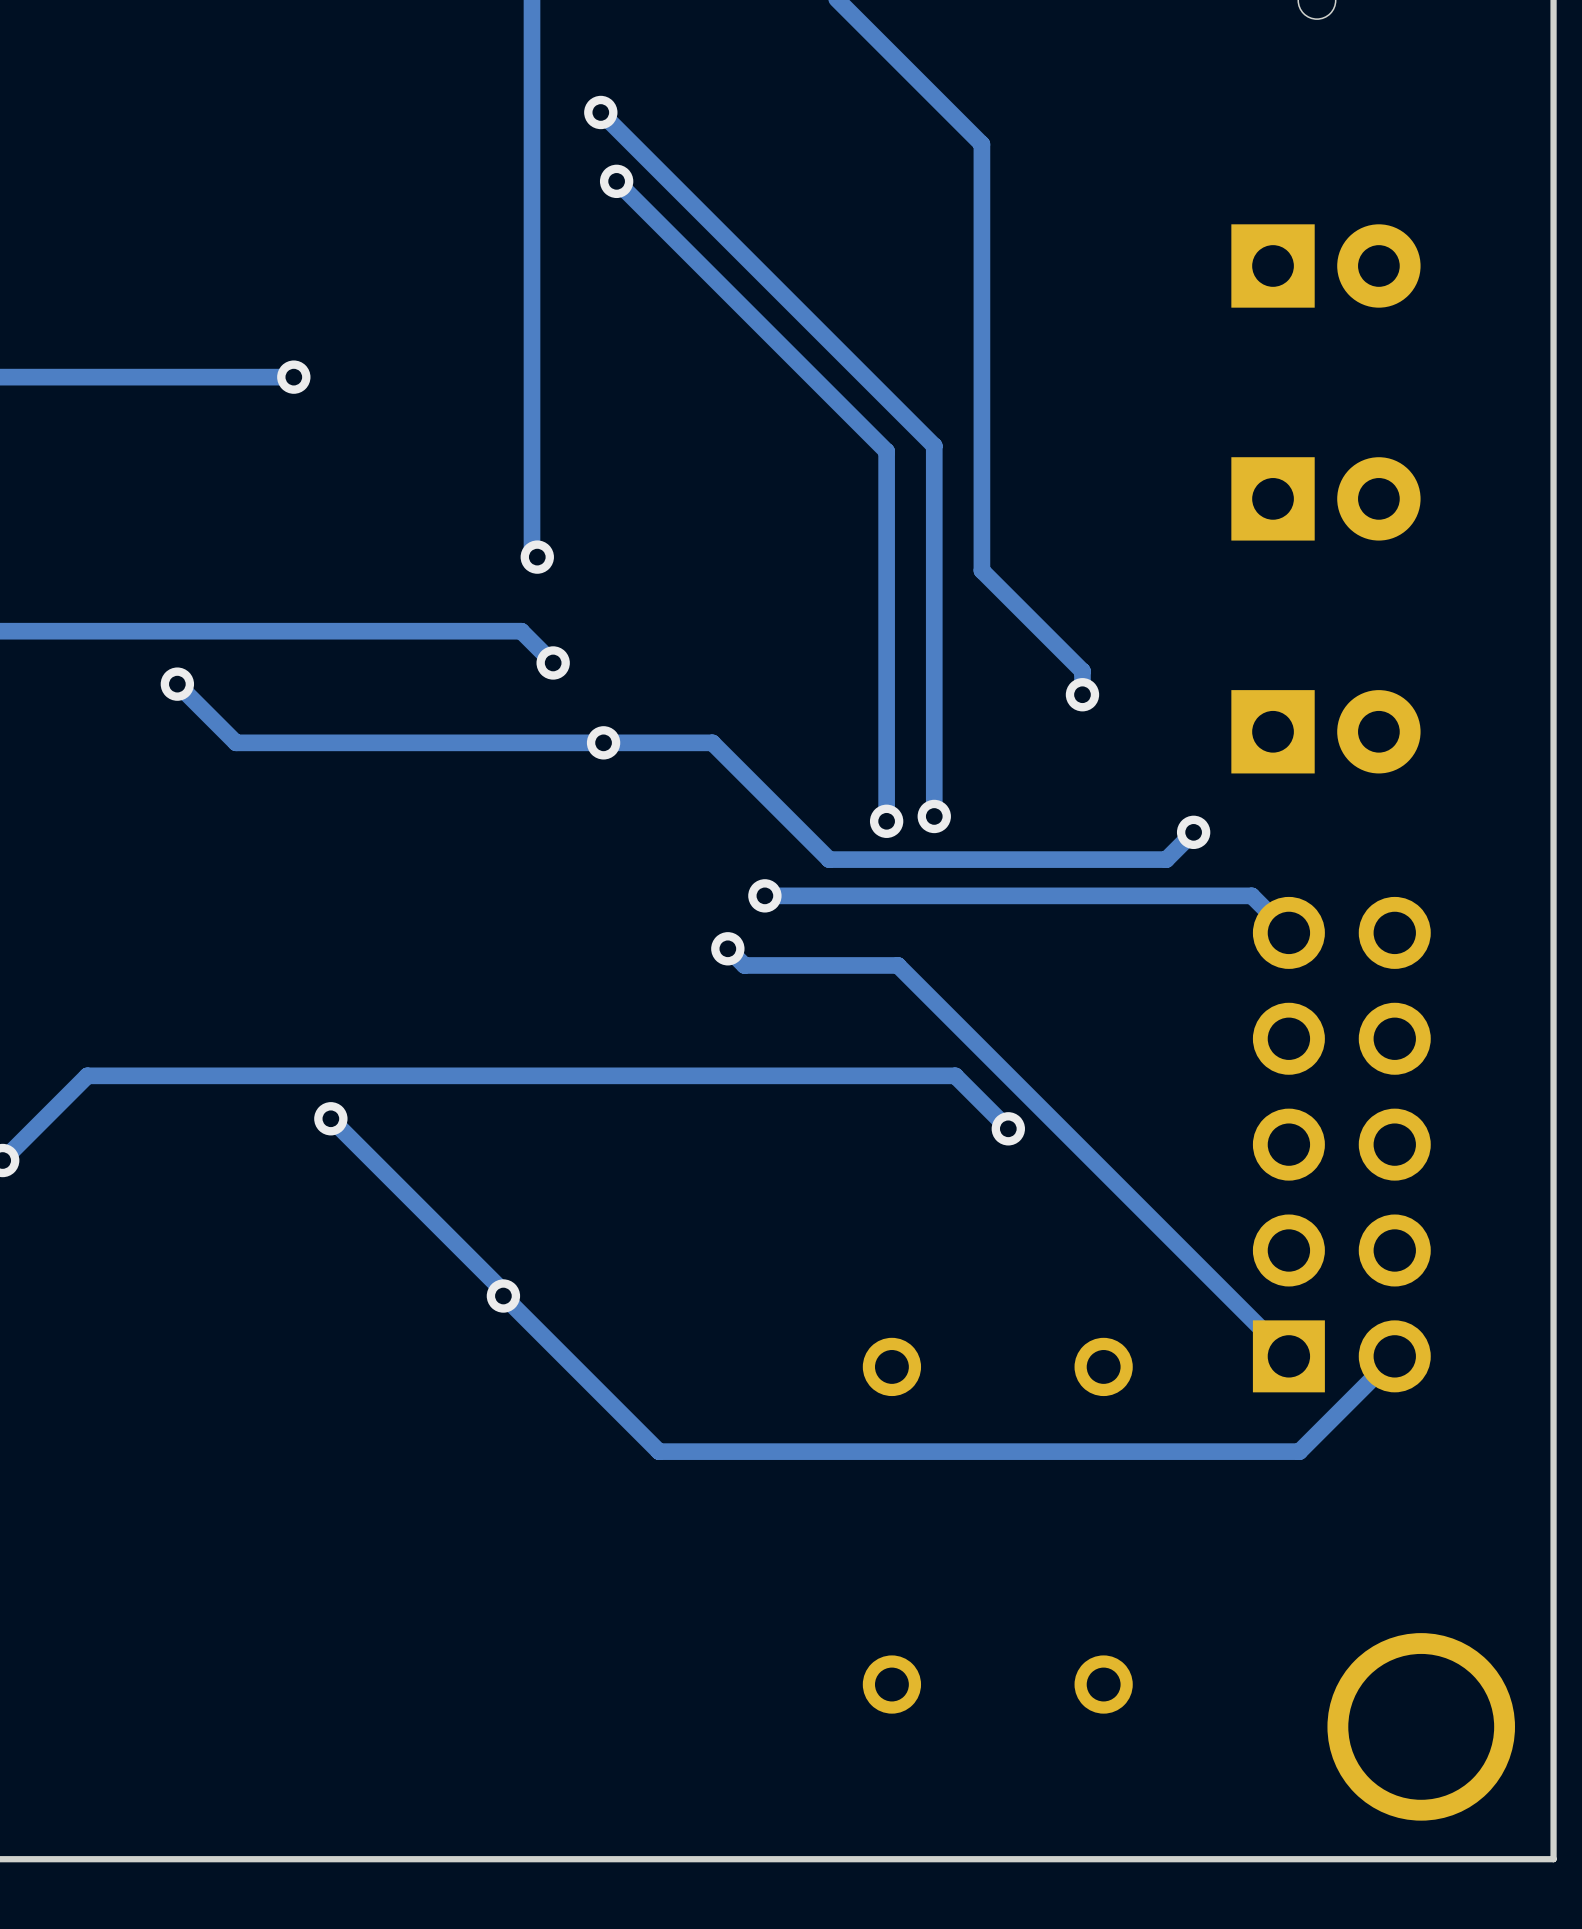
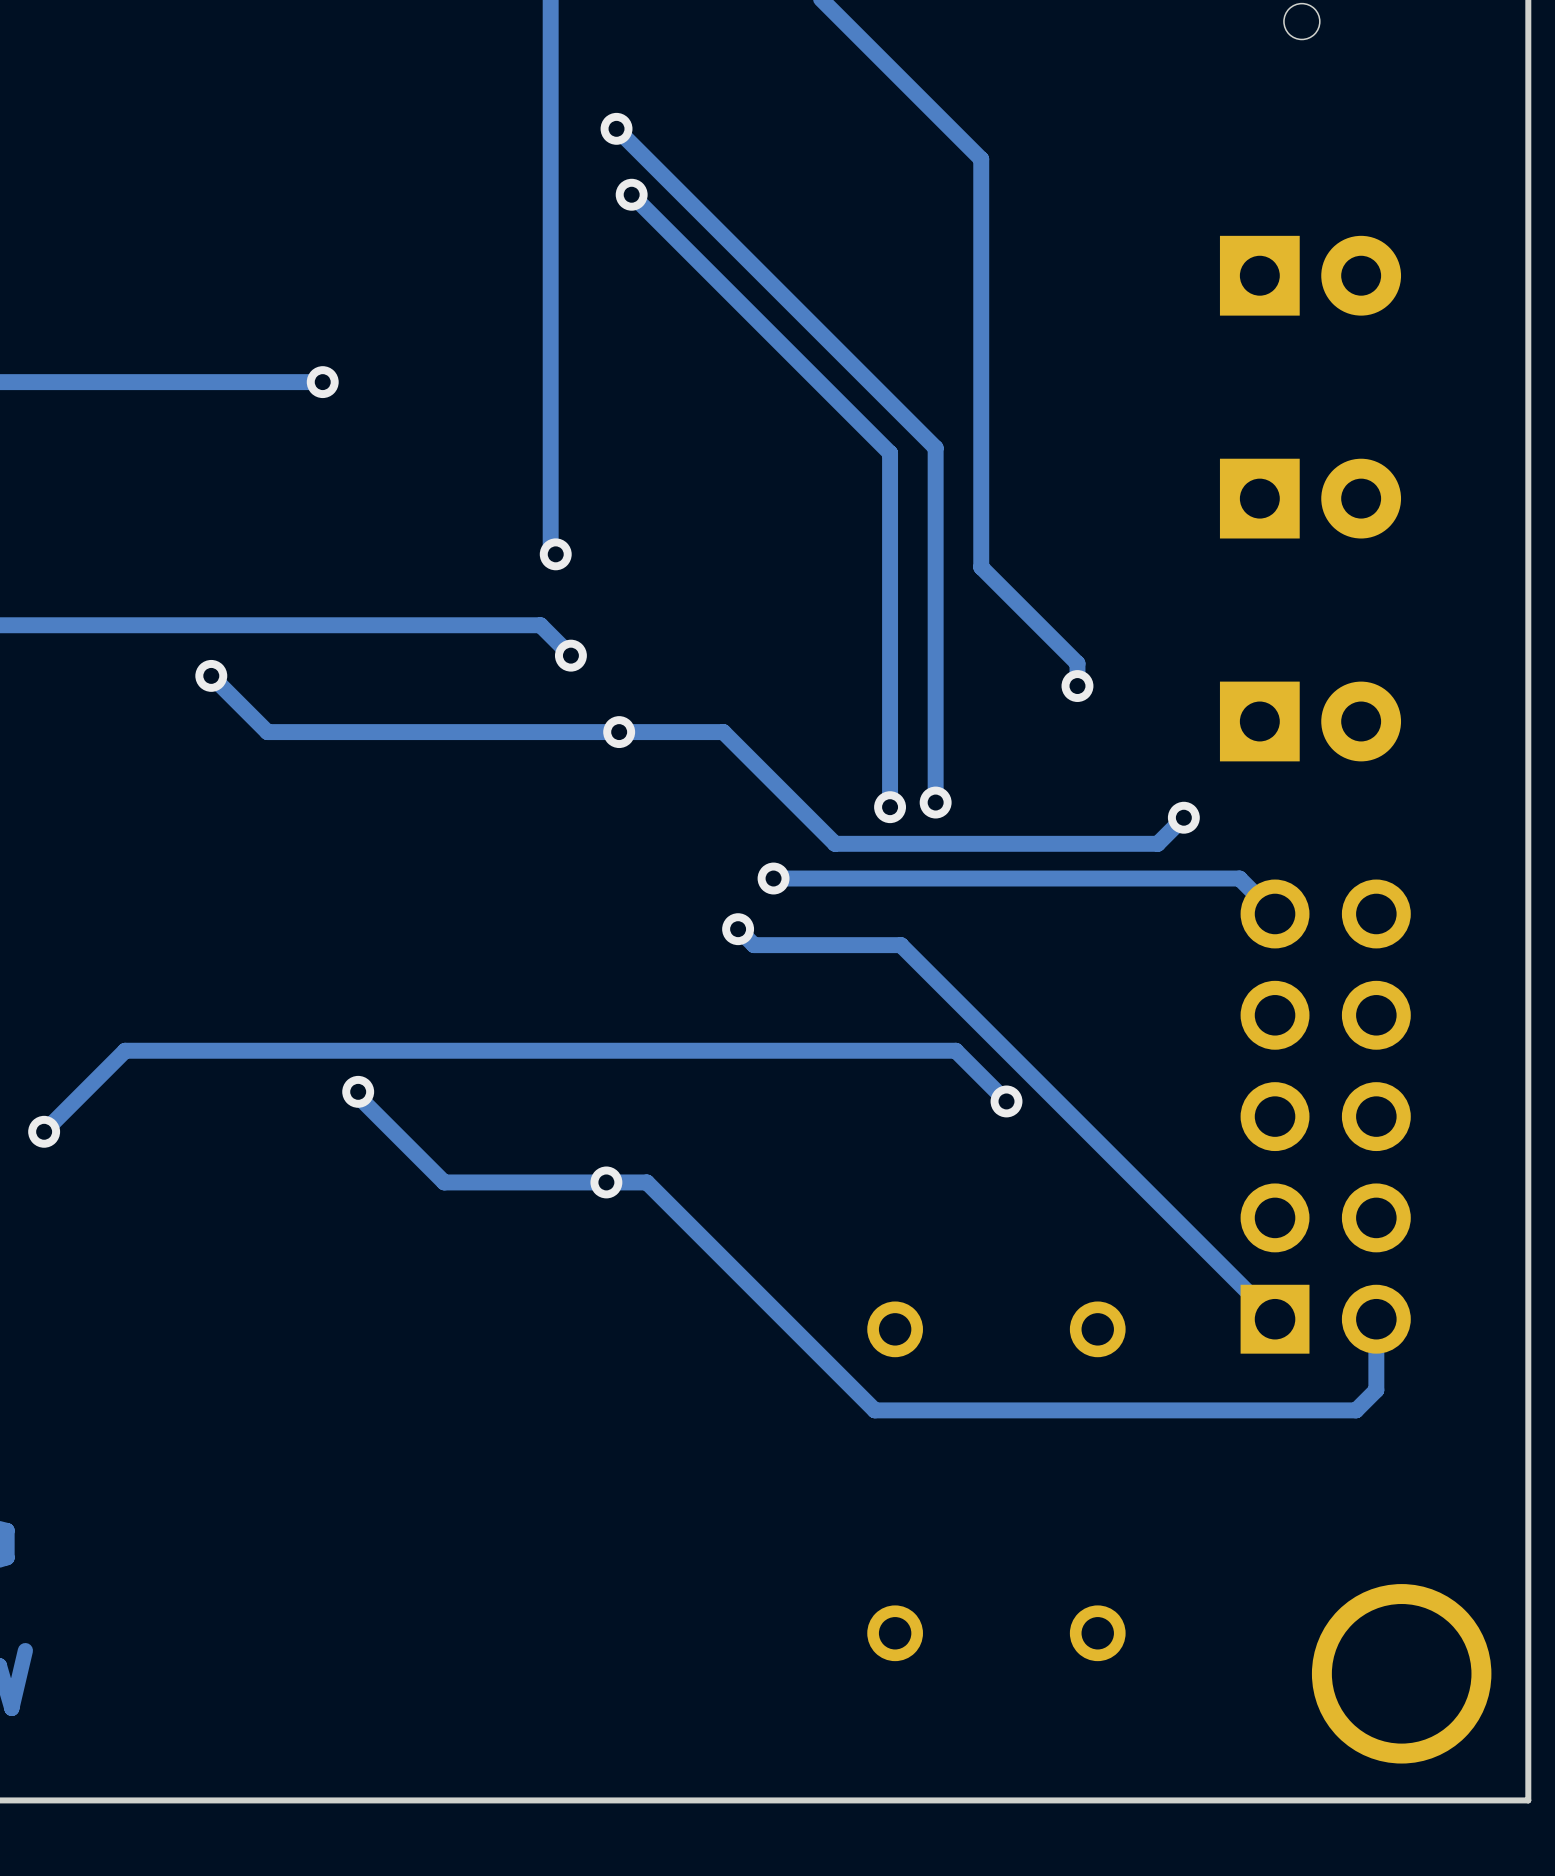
track: (330, 1118) (503, 1291) (503, 1296) (659, 1451) (870, 1451) -> (358, 1096) (444, 1182) (646, 1182) (874, 1410)
via position: (503, 1296) -> (606, 1182)
track: (1394, 1356) (1299, 1451) -> (1376, 1319) (1376, 1390) (1356, 1410) (1285, 1410)

